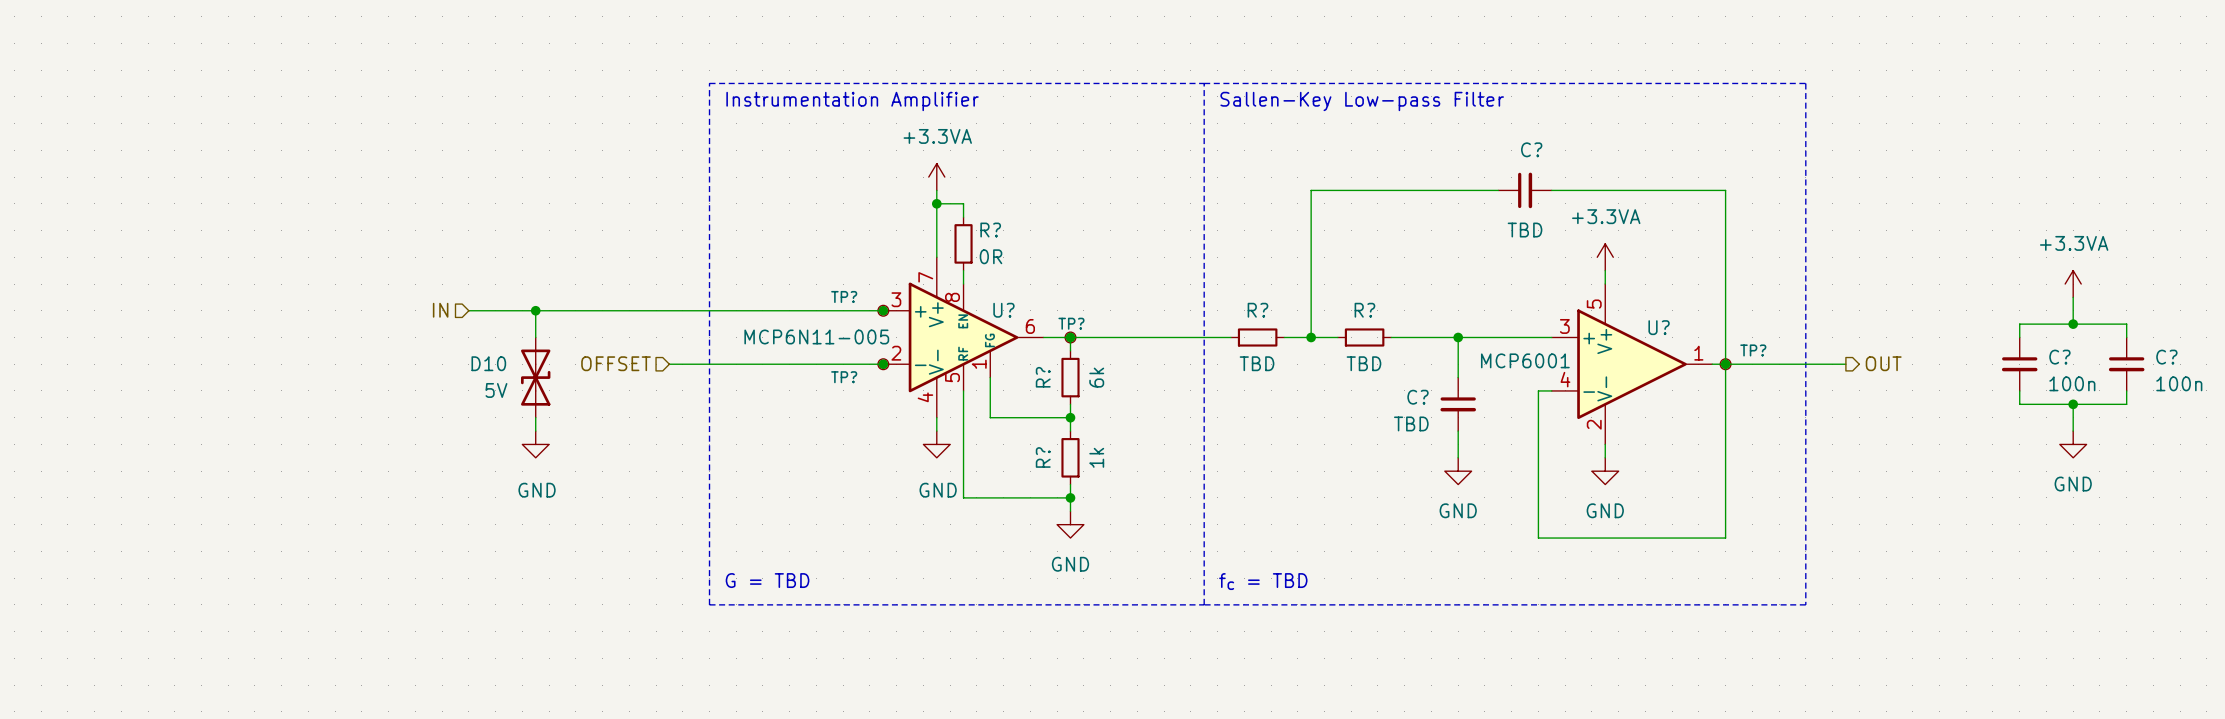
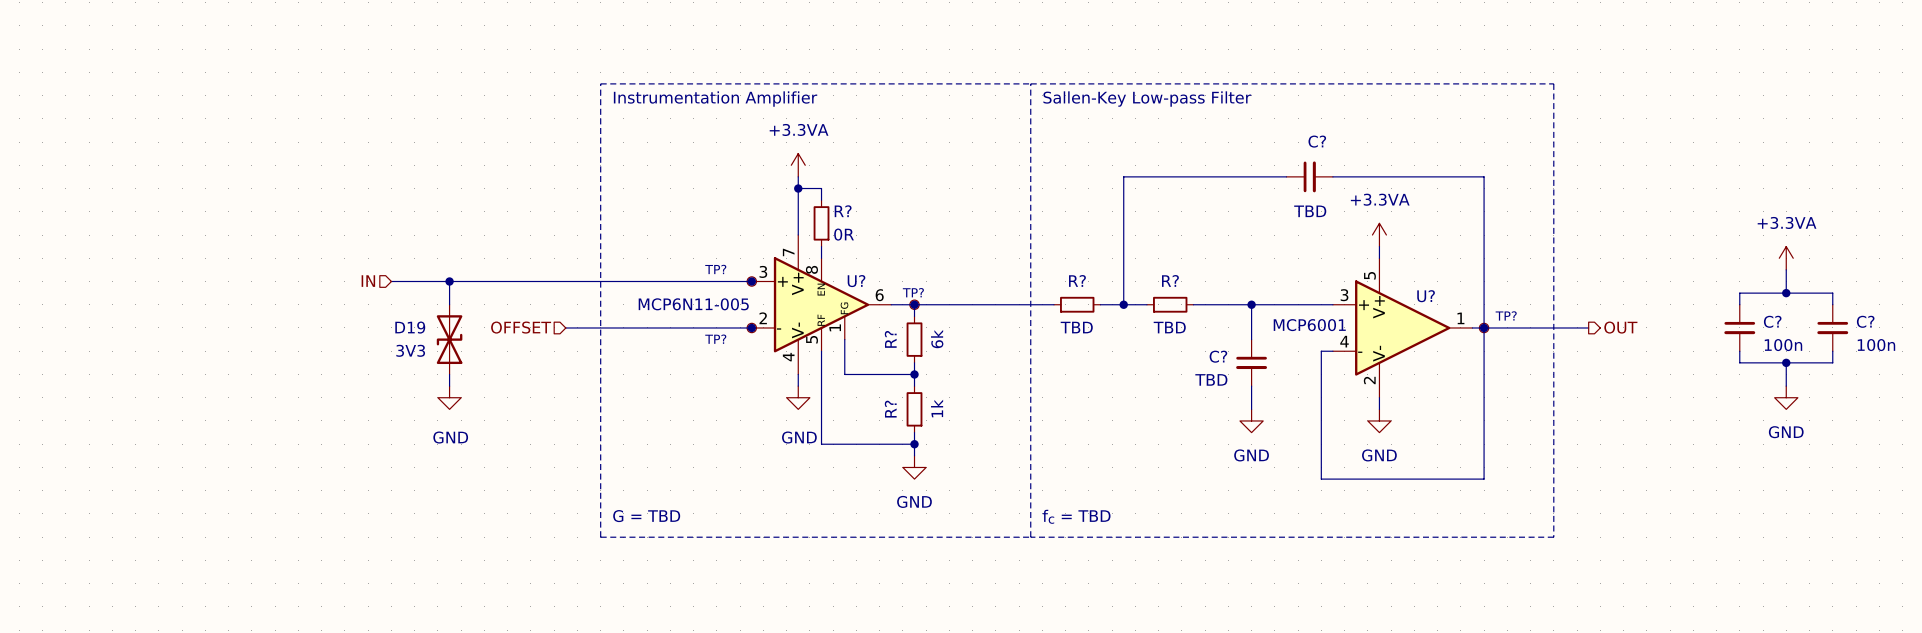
D10 name: D10 (488, 363) -> D19 (410, 327)
D10 value: 5V (496, 390) -> 3V3 (410, 350)

